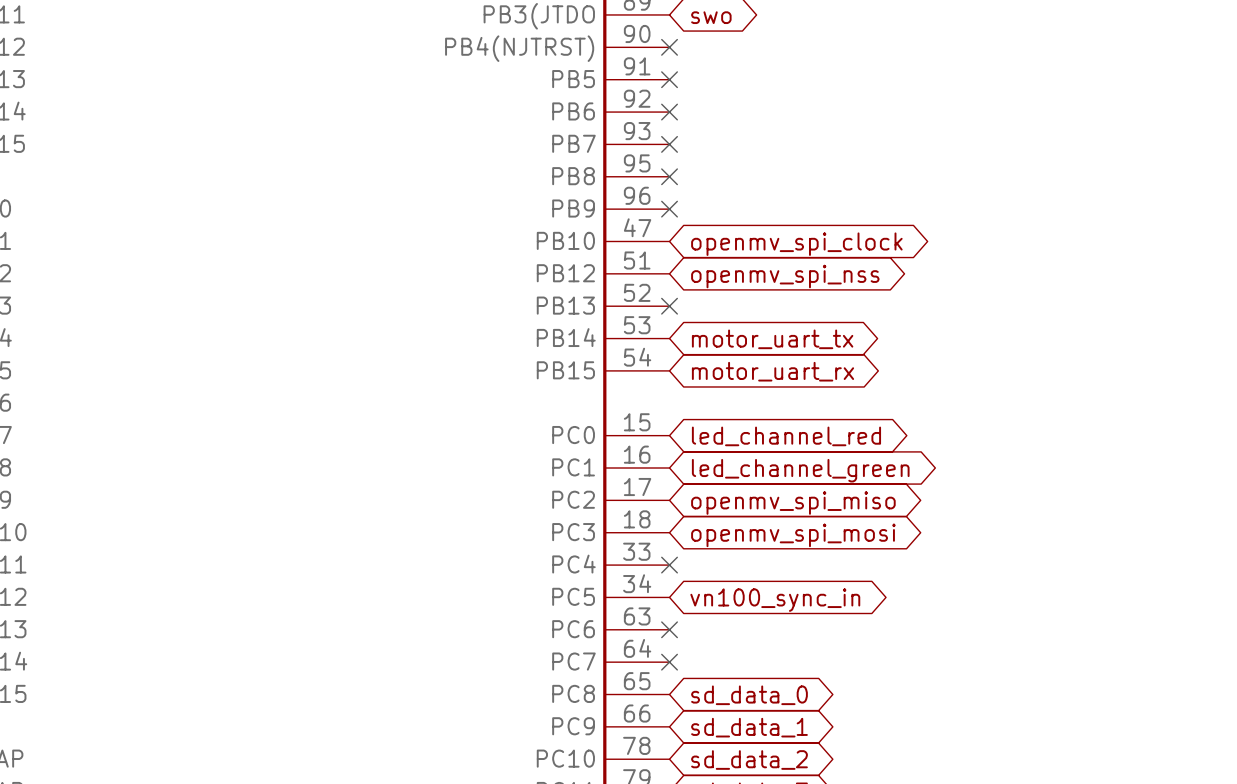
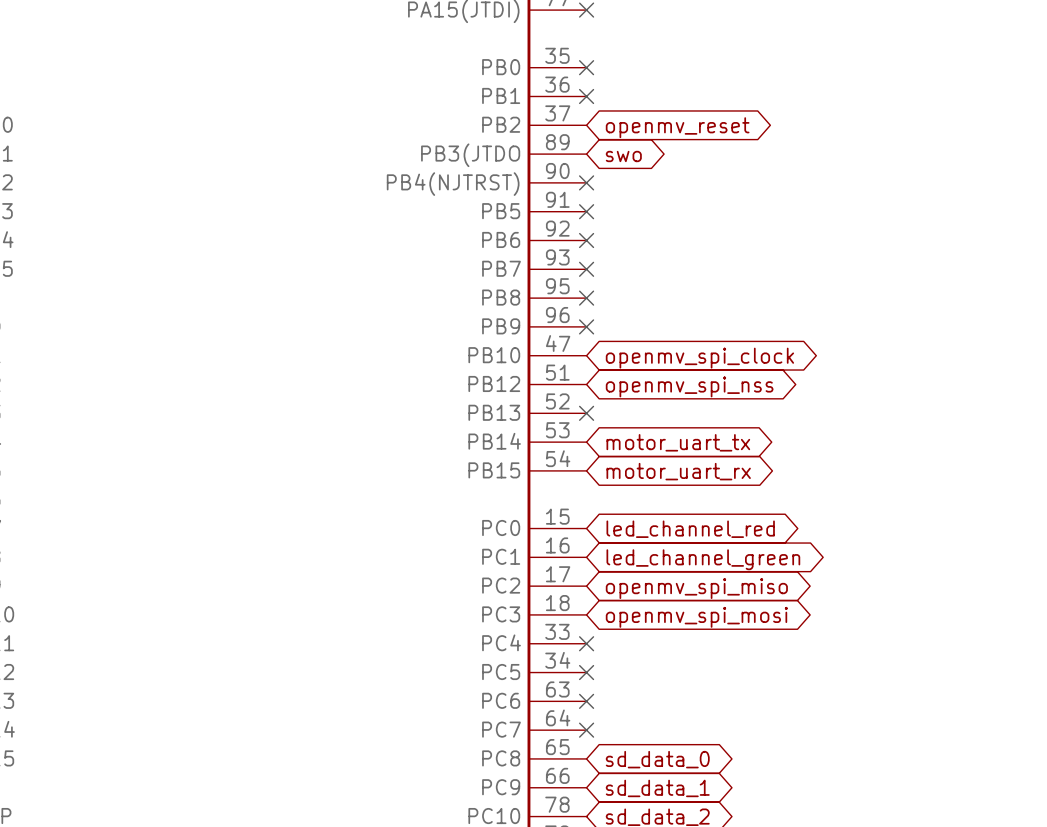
no-connect mark: none -> (586, 672)
global label: vn100_sync_in (775, 600) -> none

